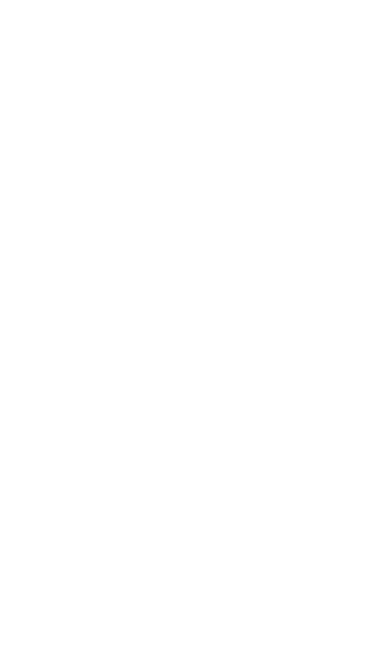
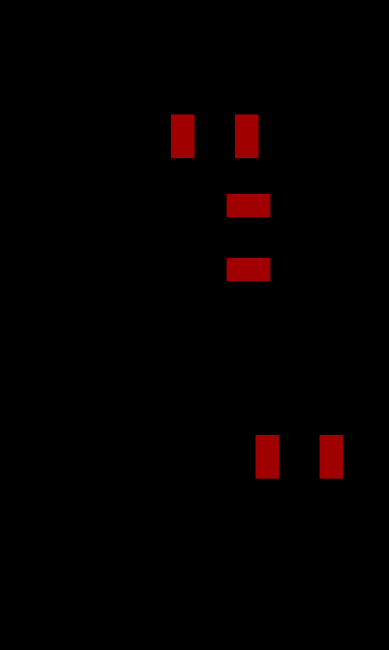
part: none -> (214, 136)
part: none -> (248, 237)
part: none -> (299, 456)

